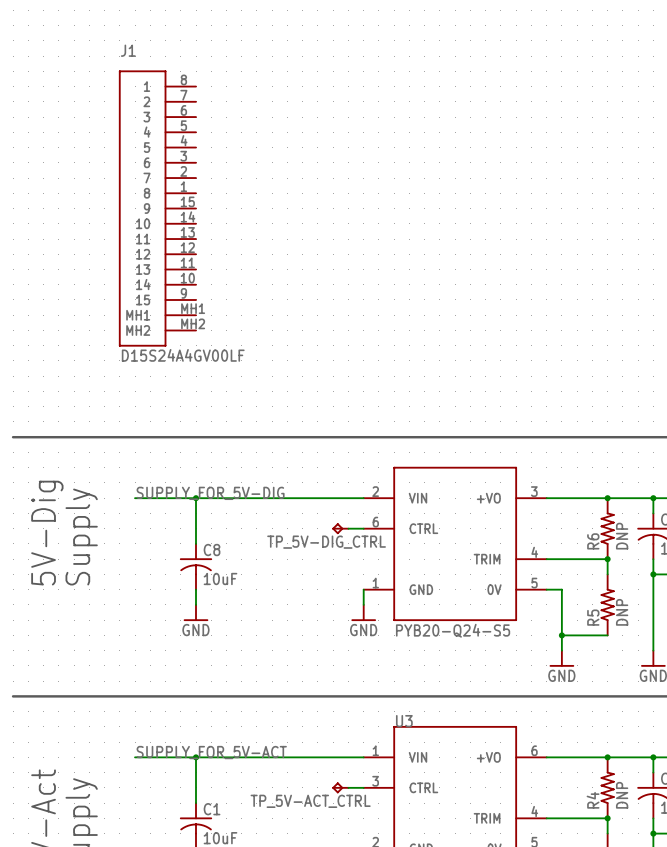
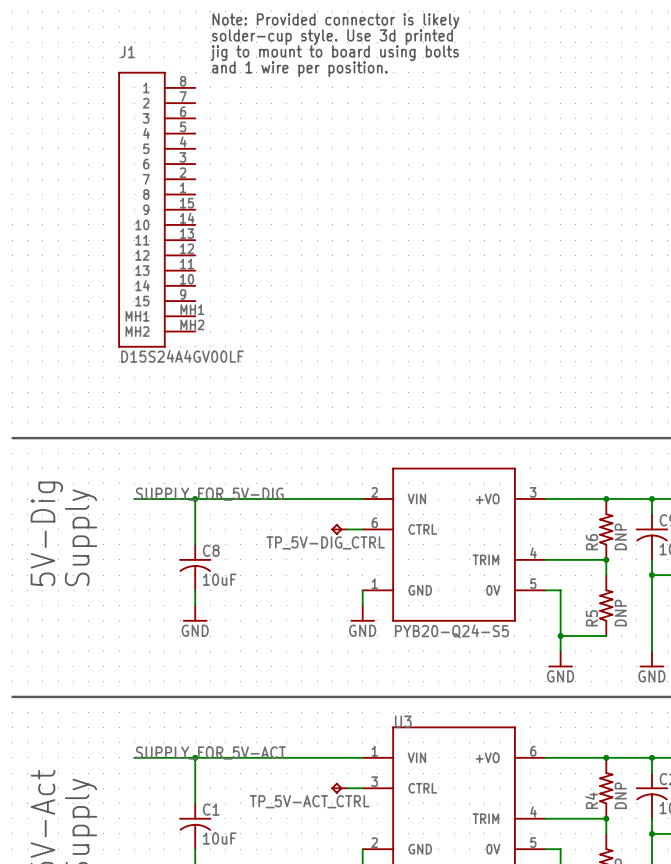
text: none -> Note: Provided connector is likely (335, 21)
text: none -> solder-cup style. Use 3d printed (332, 37)
text: none -> jig to mount to board using bolts (334, 53)
text: none -> and 1 wire per position. (299, 69)

